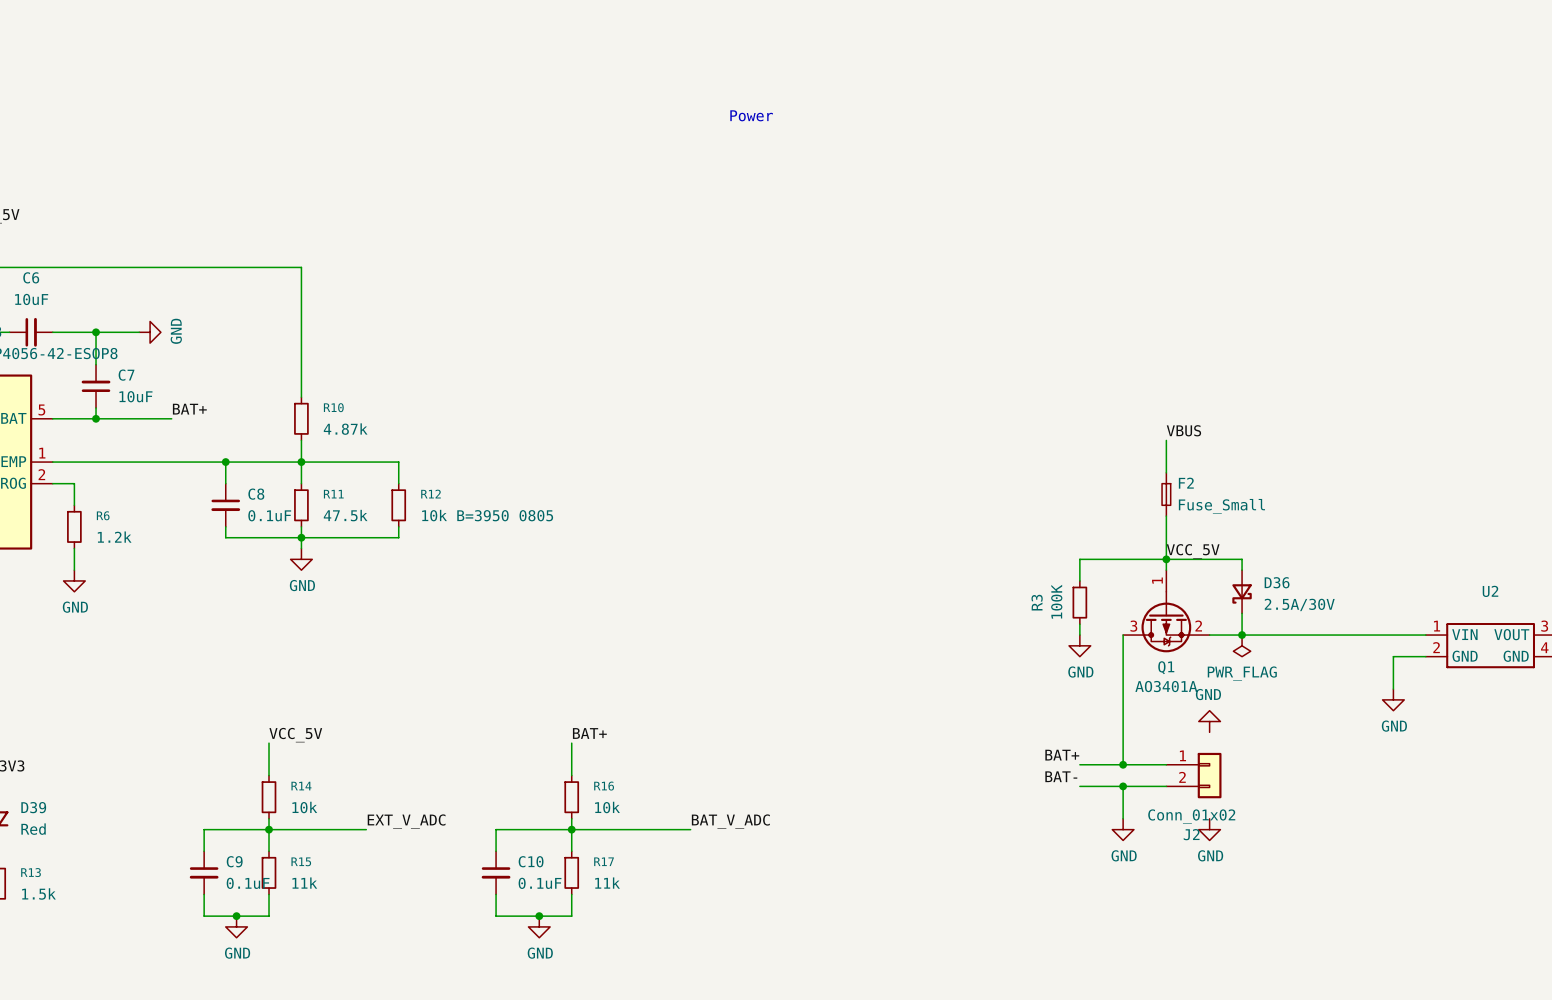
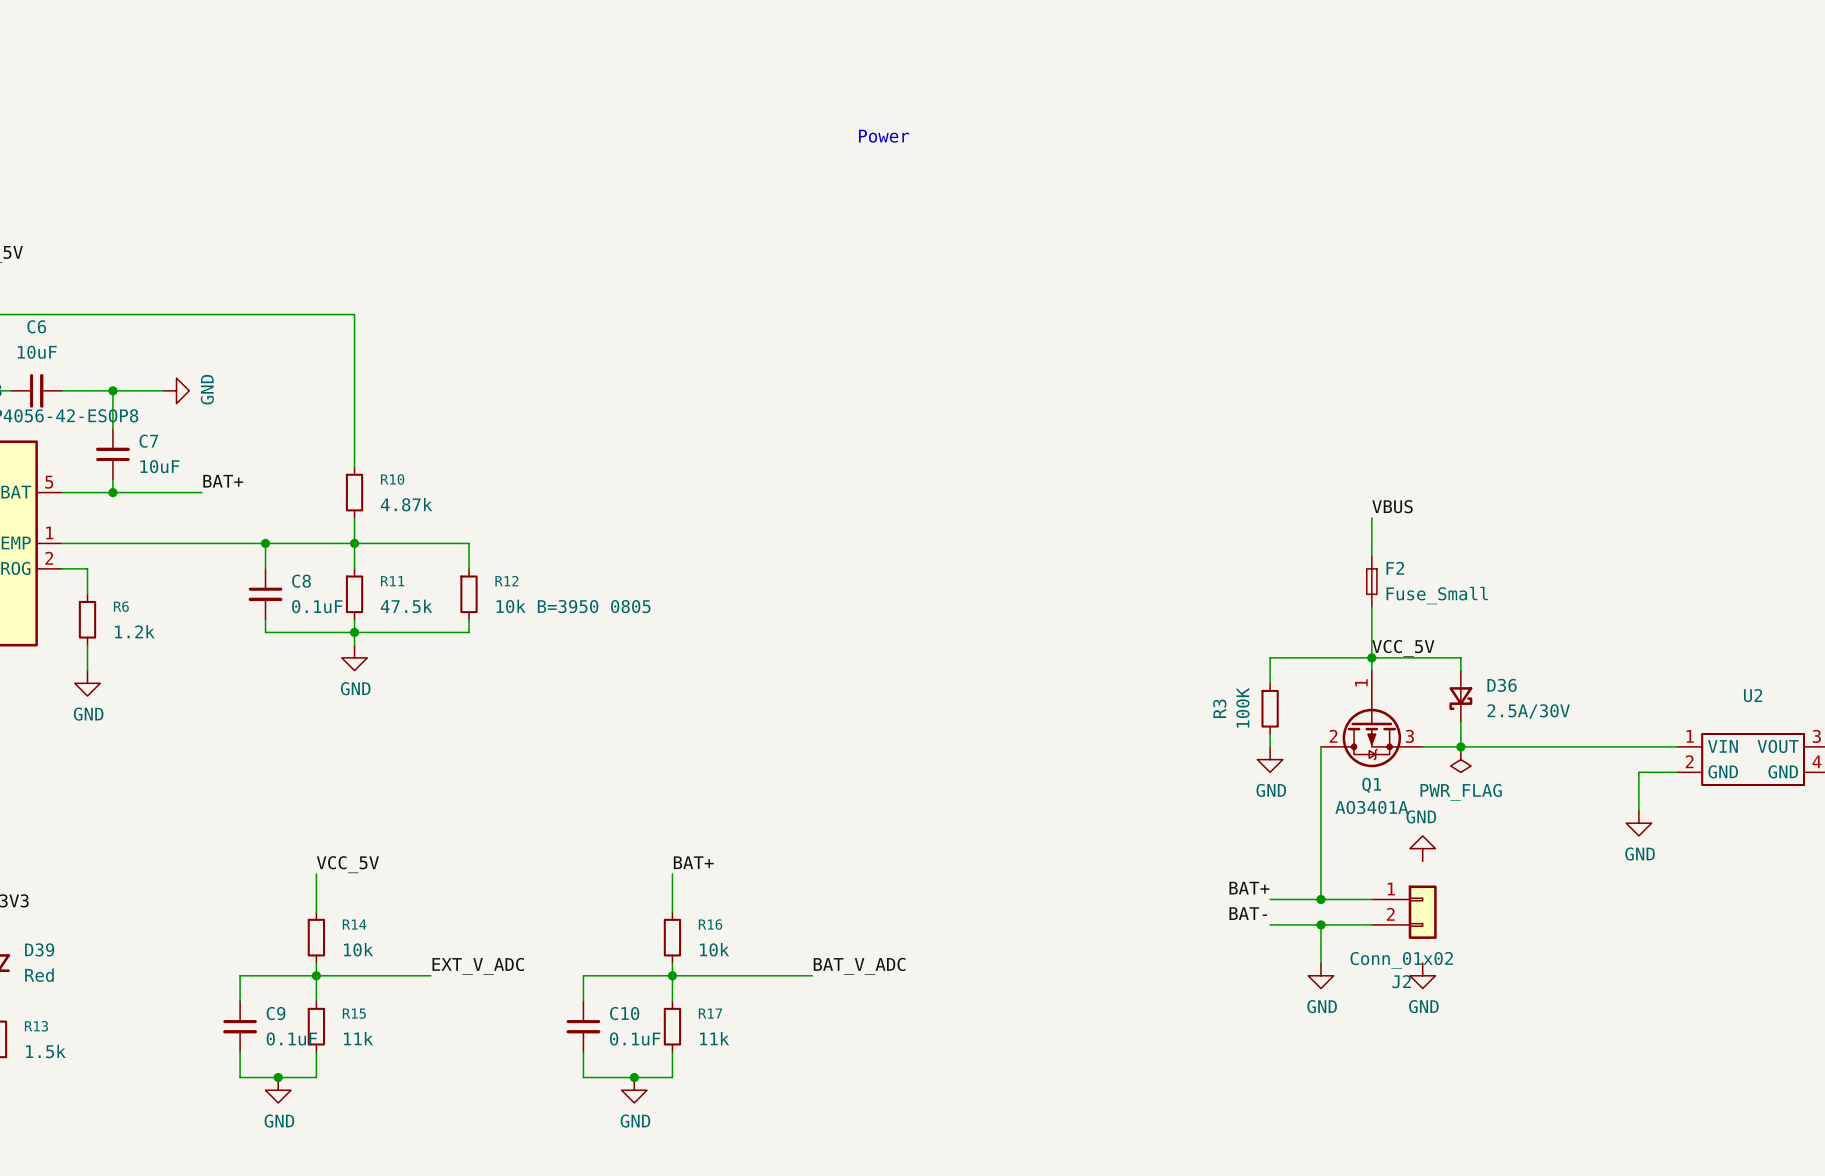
Q1 pin number: 3 (1133, 626) -> 2 (1333, 736)
Q1 pin number: 2 (1198, 626) -> 3 (1409, 736)

